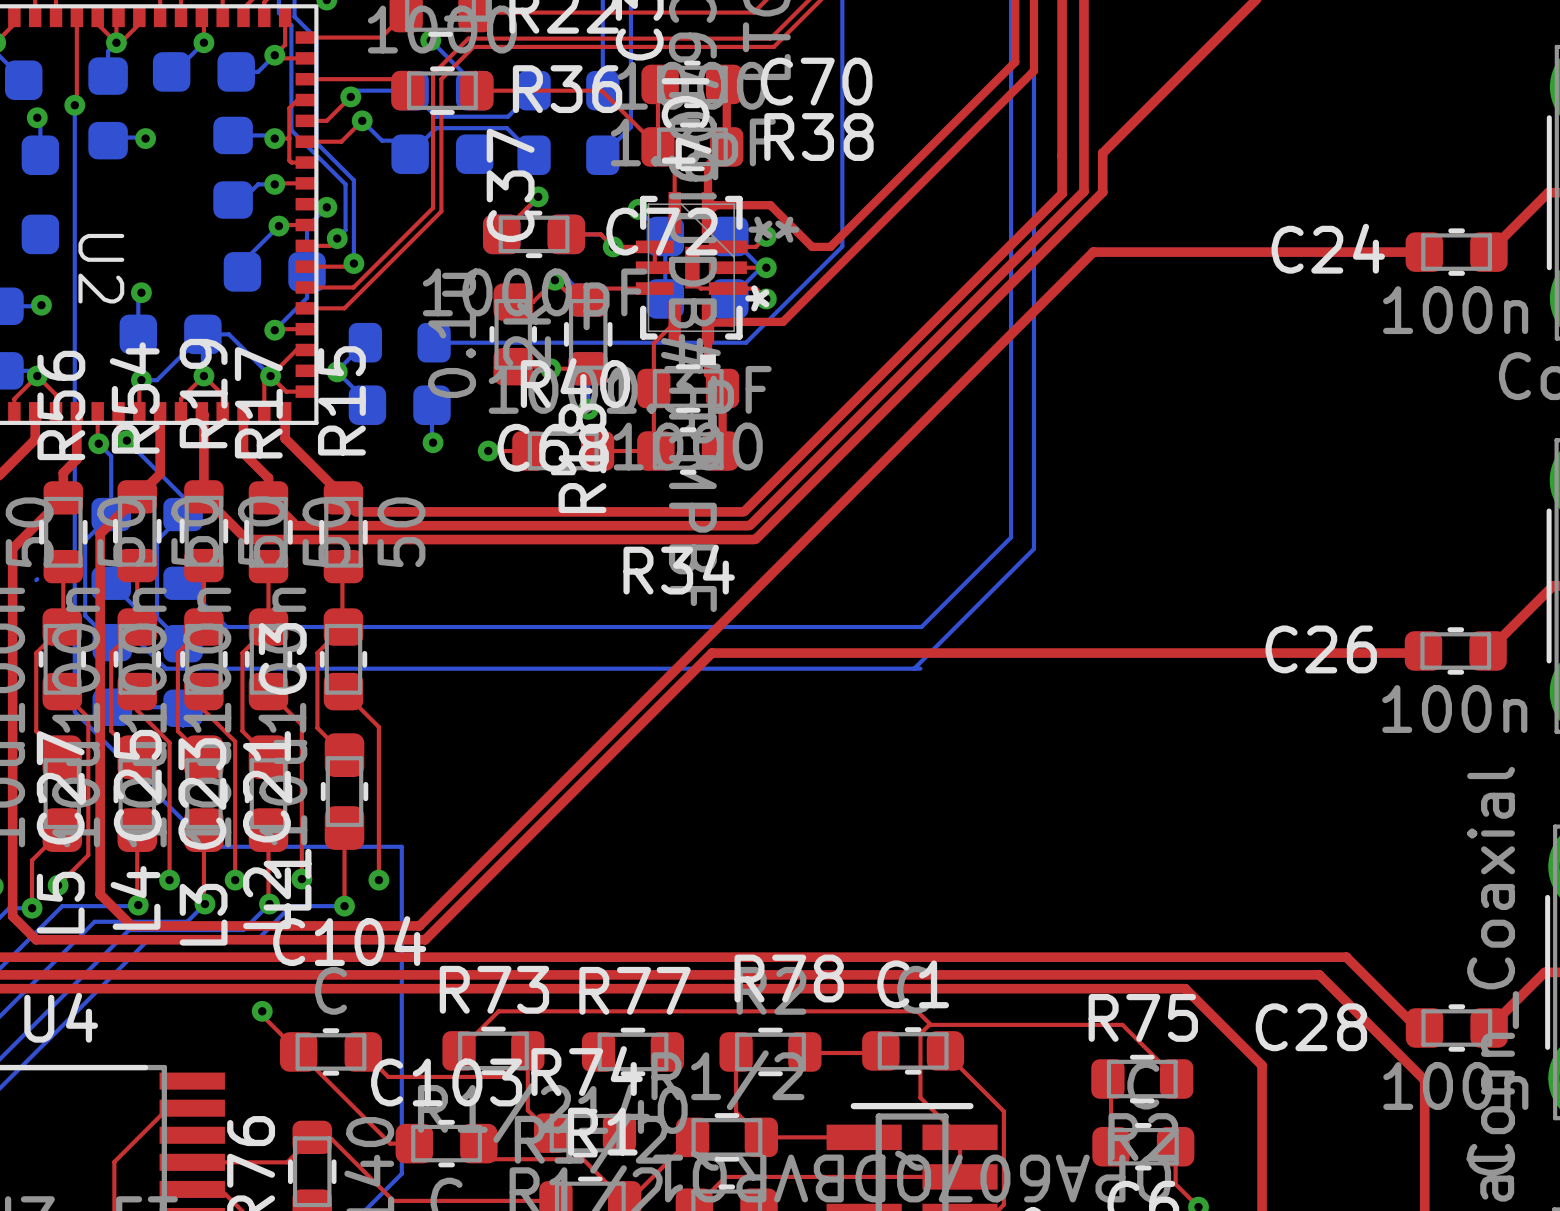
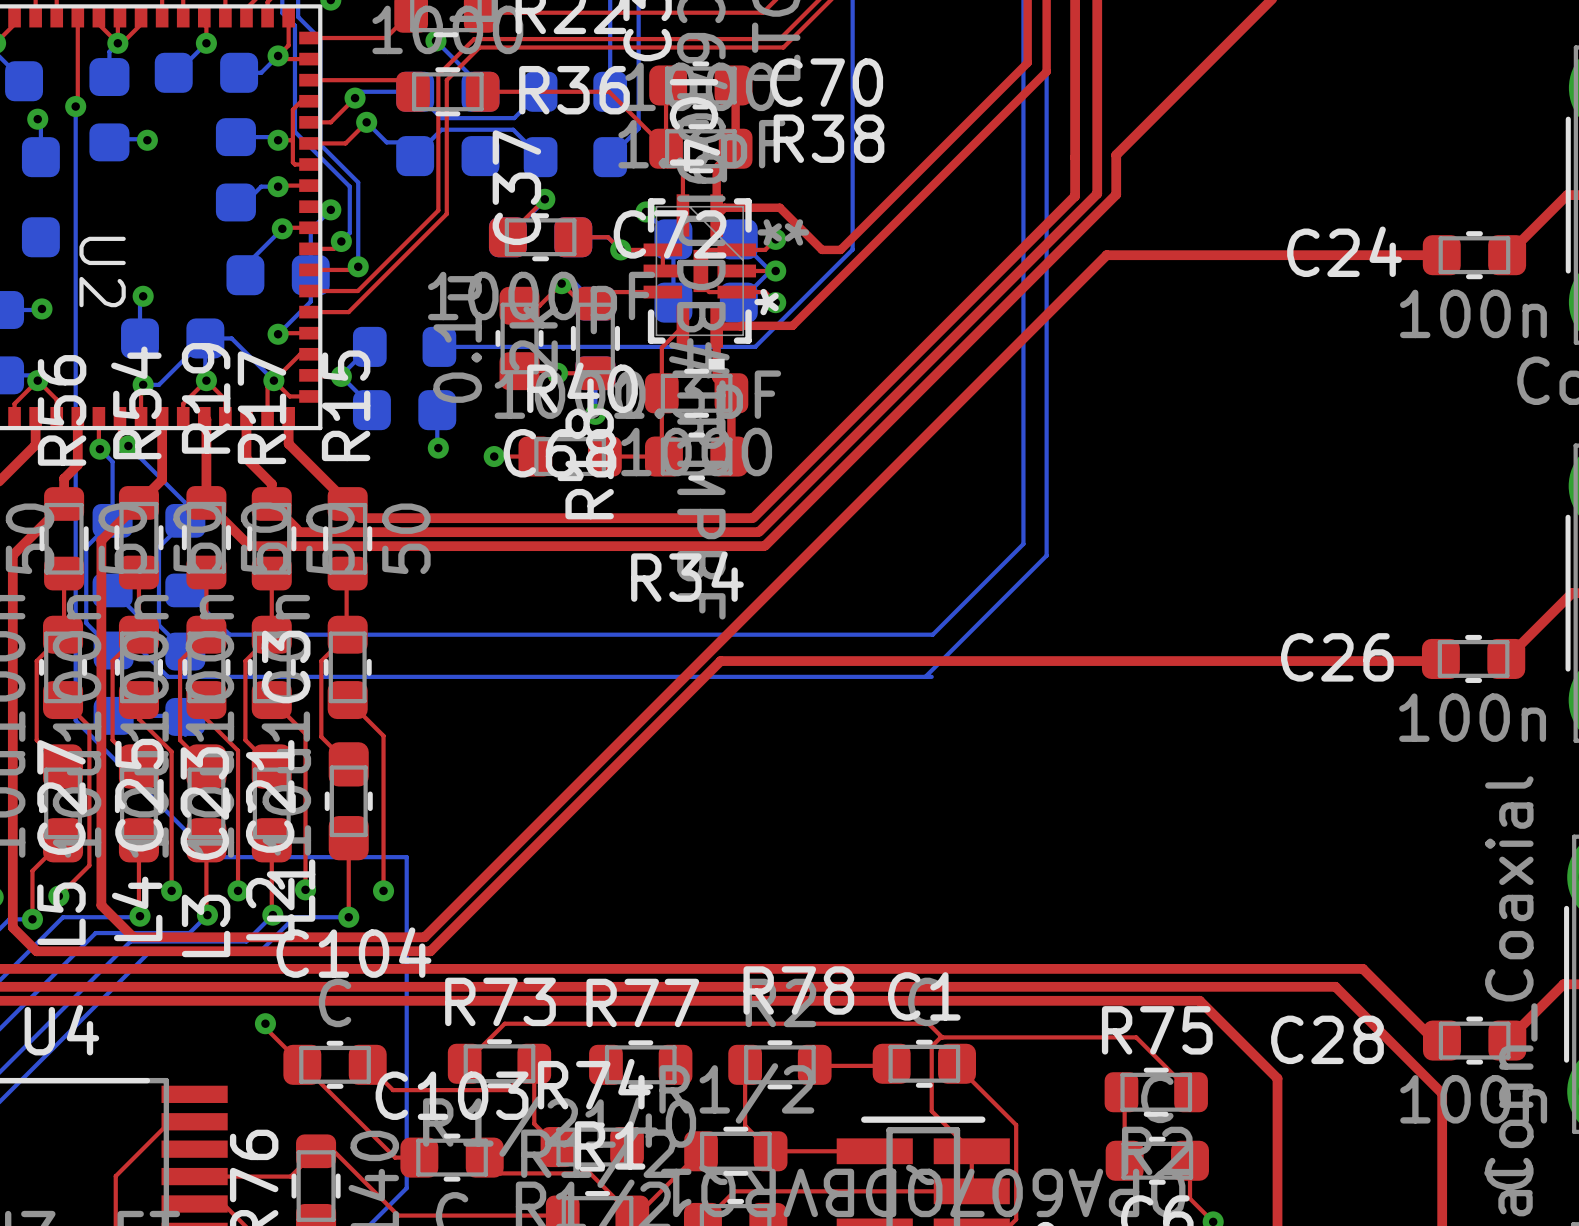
bottom track: (37, 579) (36, 580) -> none

